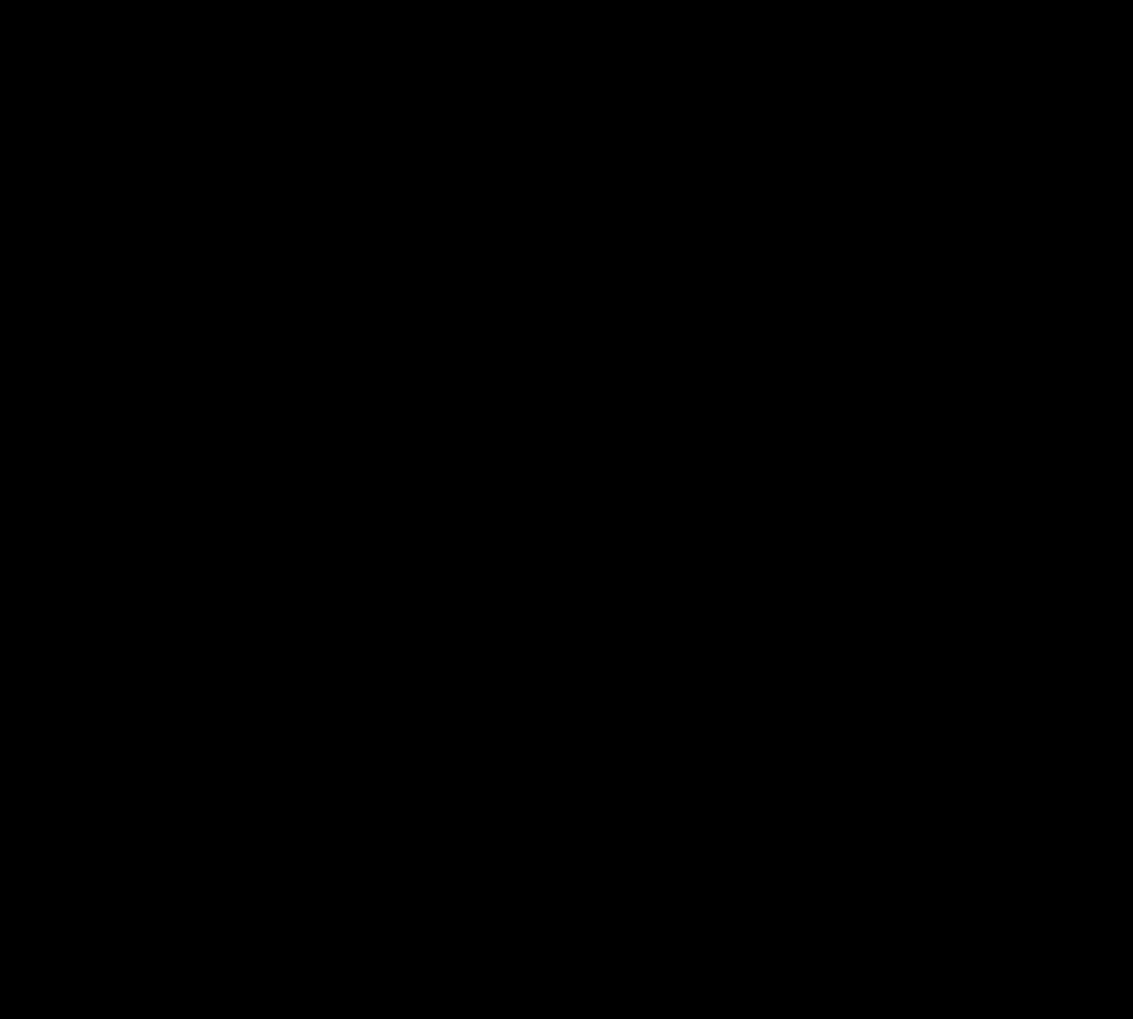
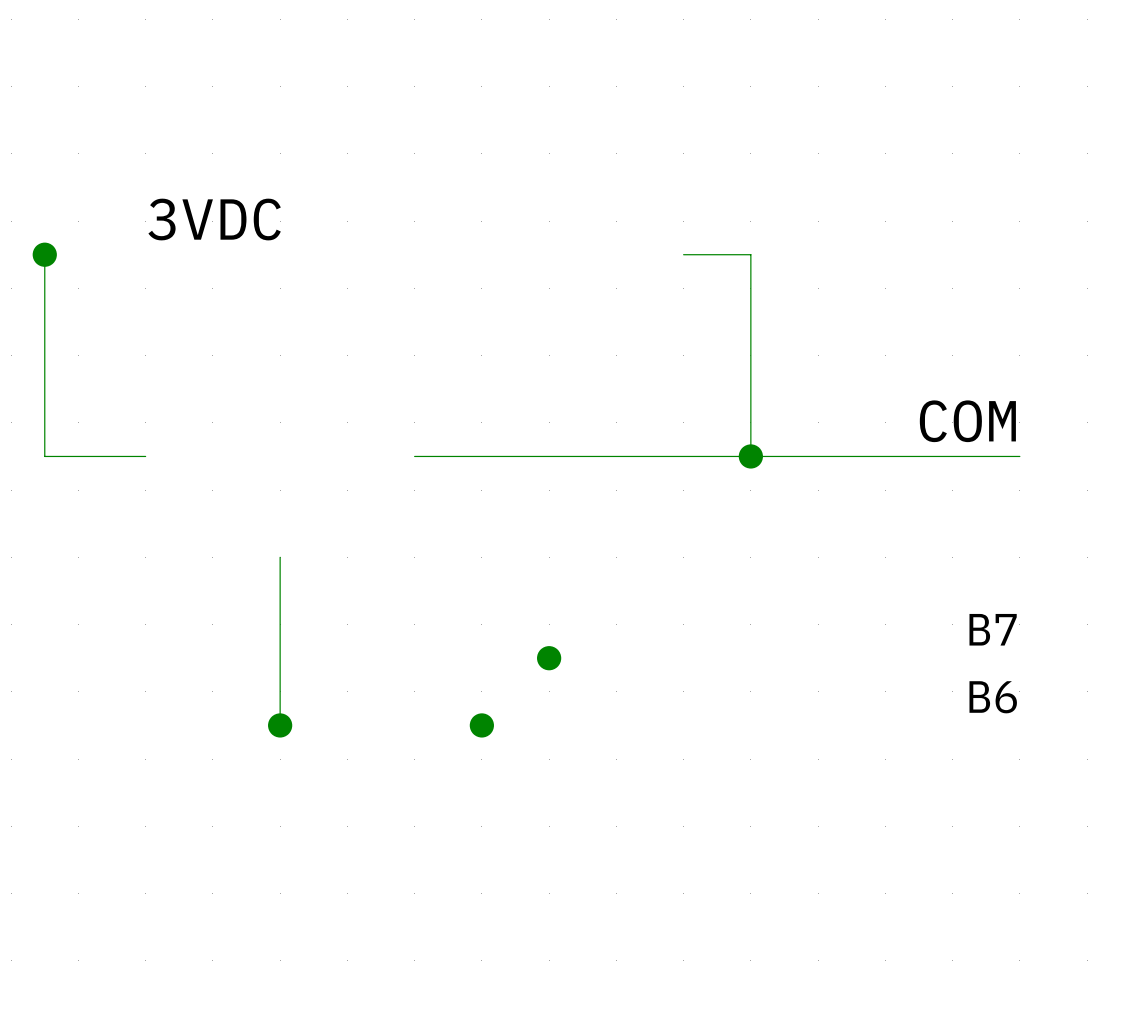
label: none -> 3VDC (214, 219)
wire: none -> (44, 254) (44, 456) (145, 456)
junction: none -> (44, 254)
wire: none -> (683, 254) (750, 254) (750, 456)
label: none -> COM (967, 421)
wire: none -> (414, 456) (1019, 456)
junction: none -> (750, 456)
wire: none -> (280, 557) (280, 725)
label: none -> B7 (993, 629)
junction: none -> (549, 658)
label: none -> B6 (993, 697)
junction: none -> (280, 725)
junction: none -> (481, 725)

